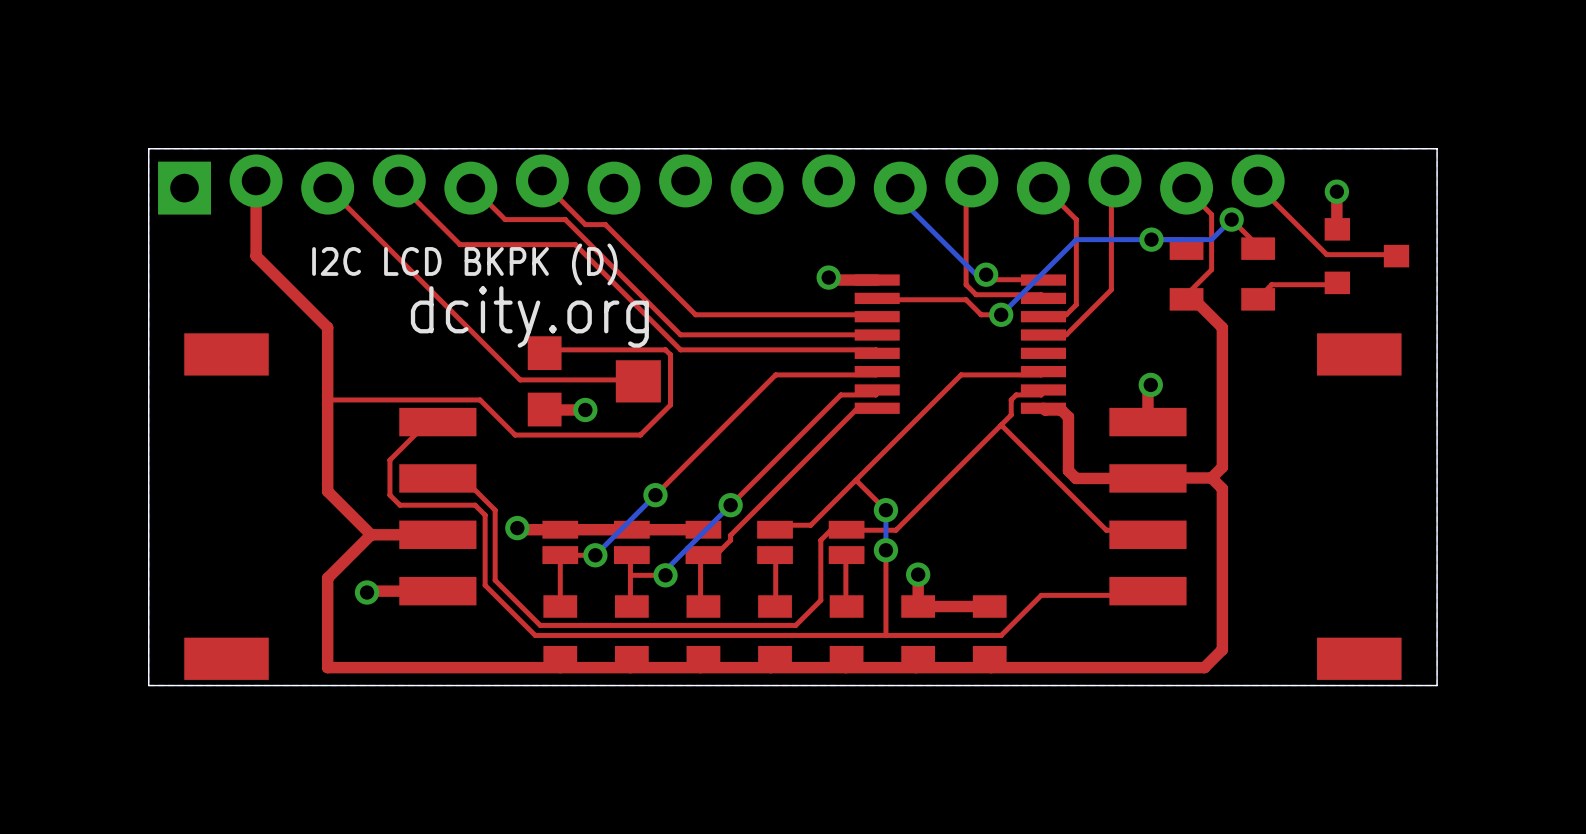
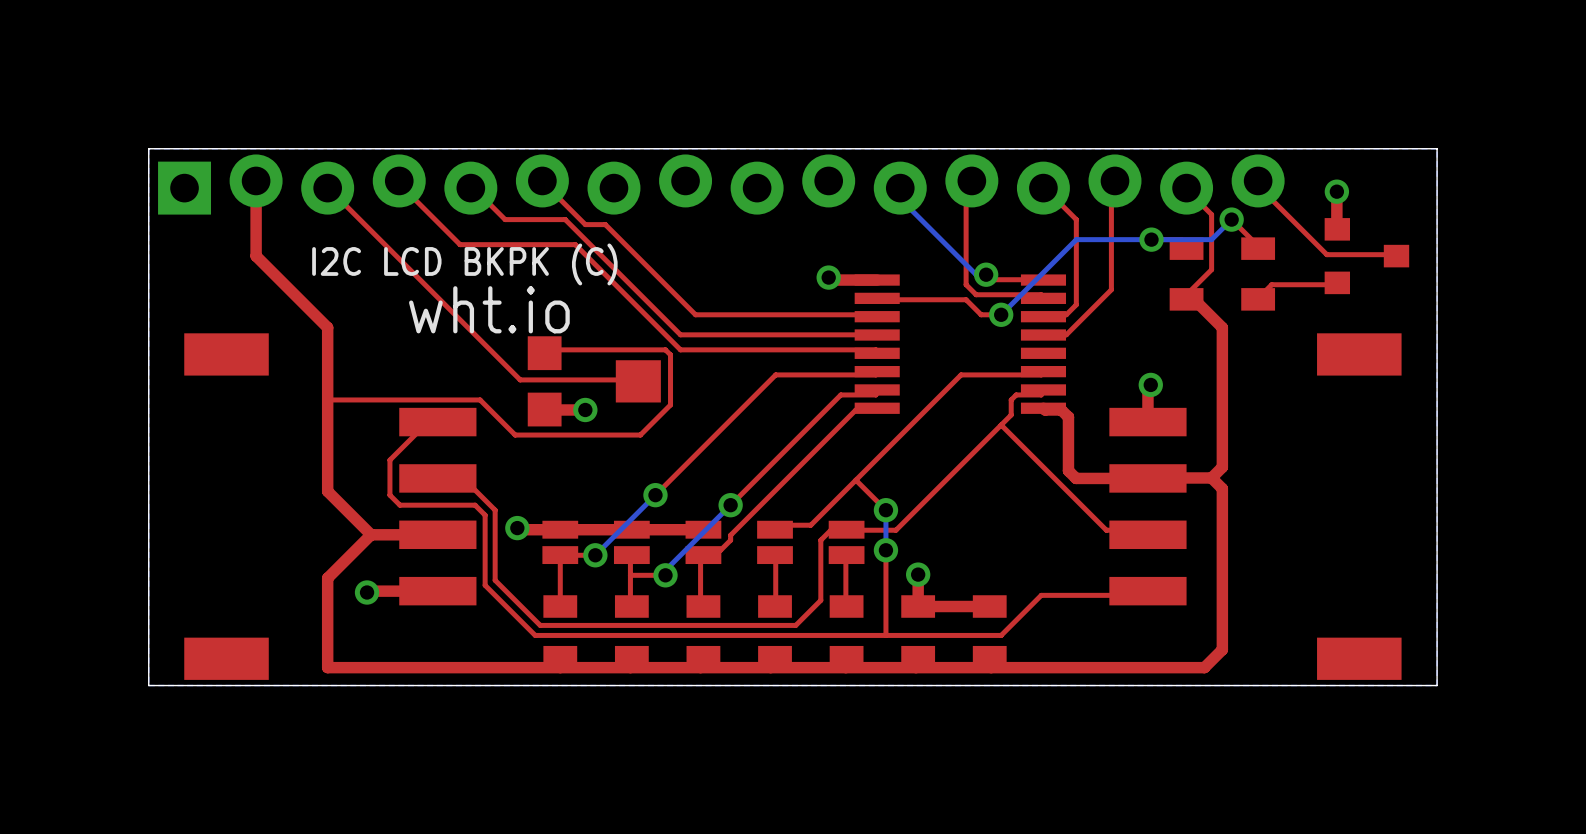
text: I2C LCD BKPK (D) (464, 264) -> I2C LCD BKPK (C) (464, 264)
text: dcity.org (529, 316) -> wht.io (489, 309)

